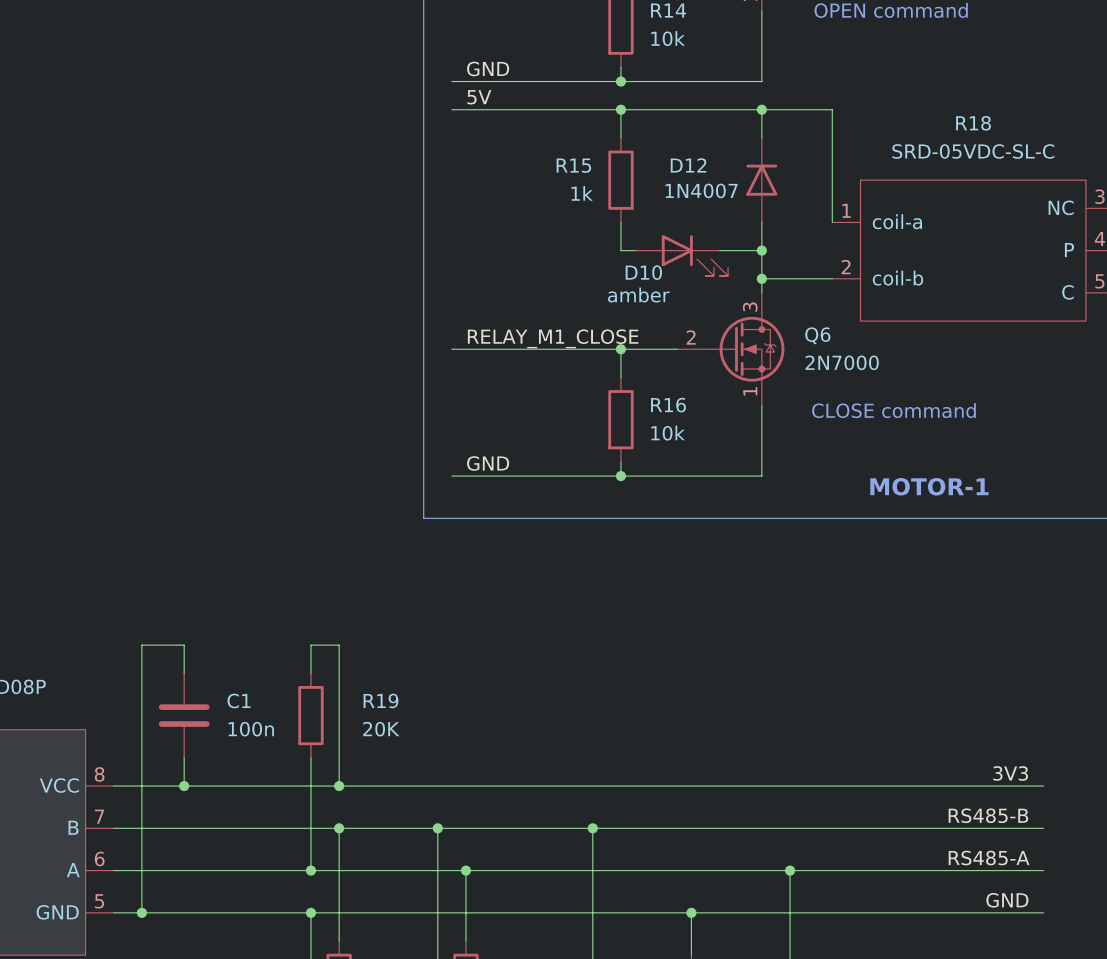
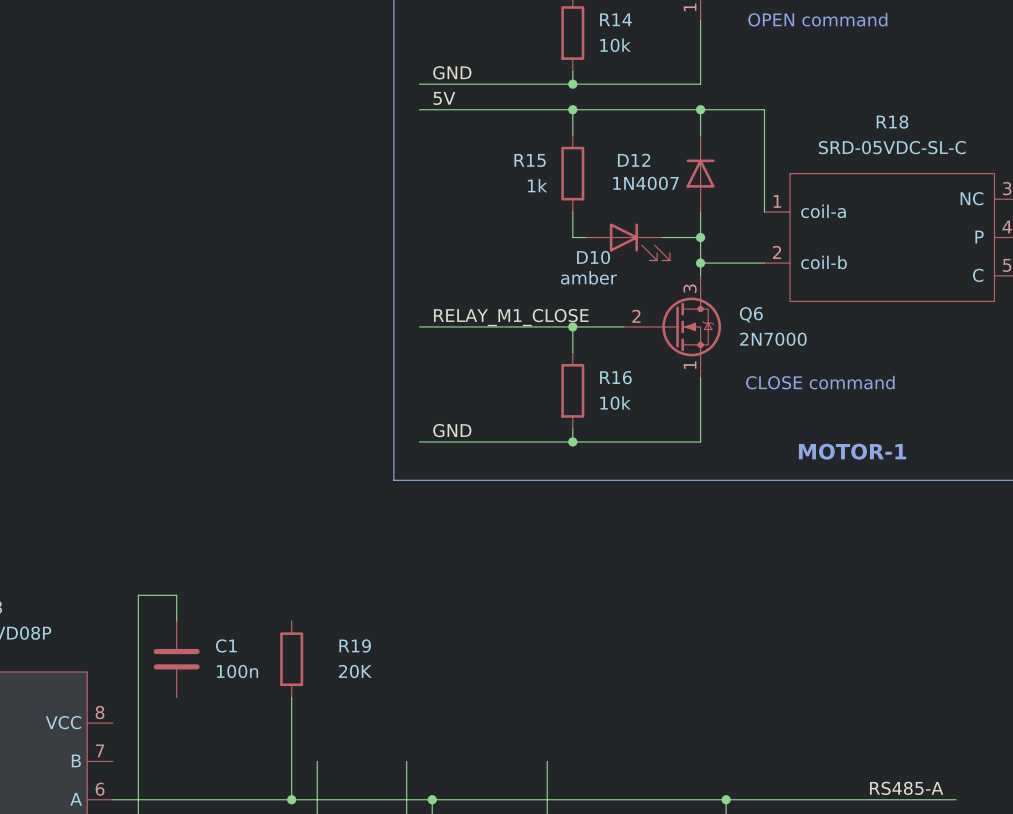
wire: (310, 673) (310, 645) (339, 645) (339, 786) -> none
wire: (184, 757) (184, 786) -> none
label: 3V3 (1010, 773) -> none
wire: (113, 786) (1043, 786) -> none
junction: (184, 786) -> none
junction: (339, 786) -> none
label: RS485-B (988, 815) -> none
wire: (113, 828) (1043, 828) -> none
junction: (339, 828) -> none
junction: (437, 828) -> none
junction: (592, 828) -> none

